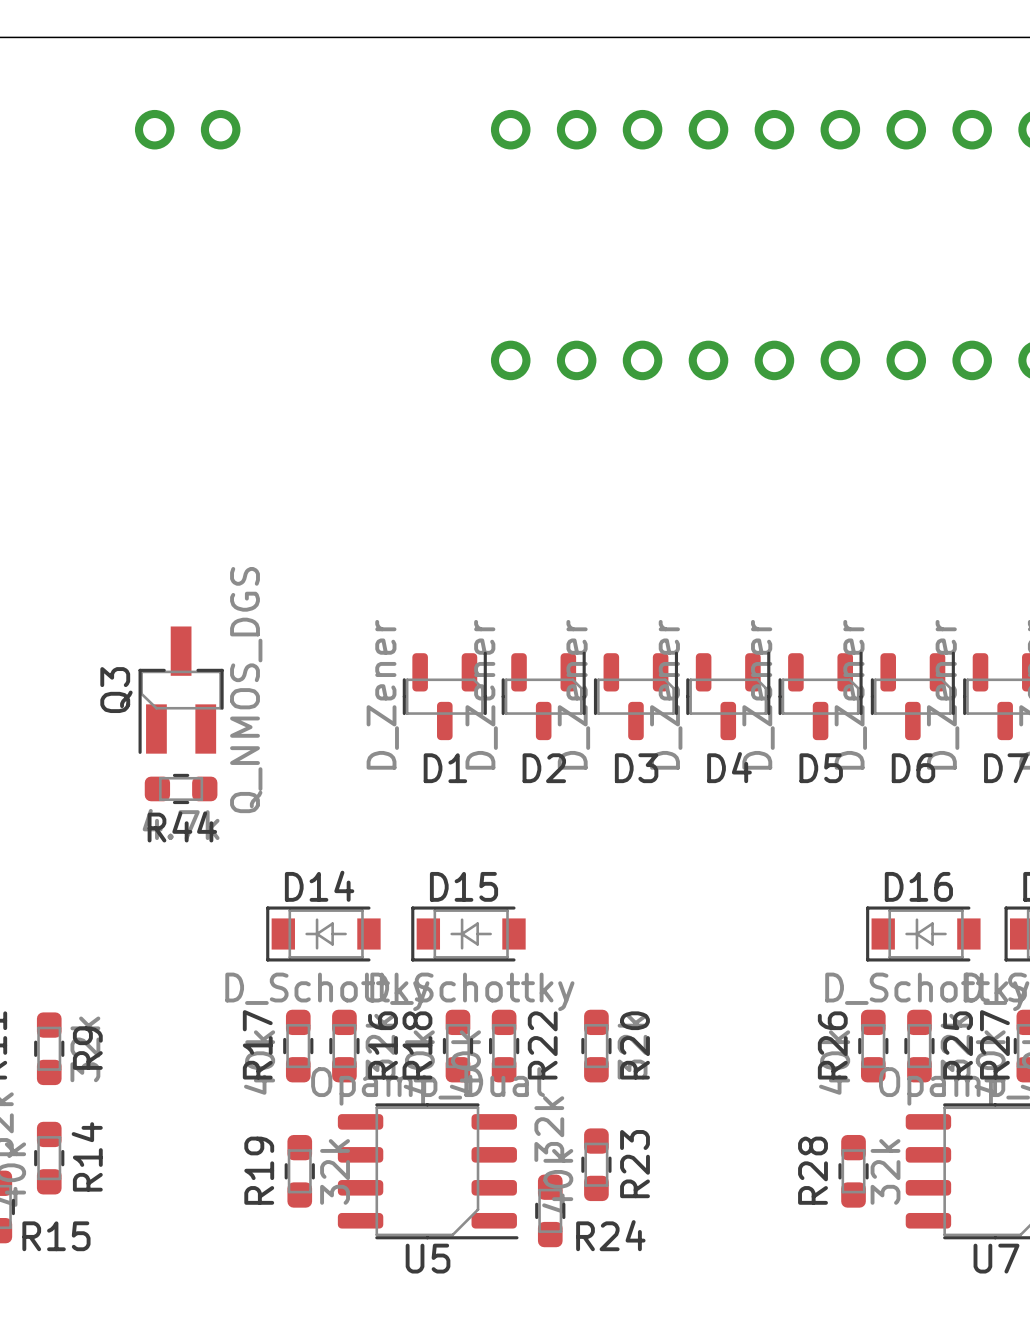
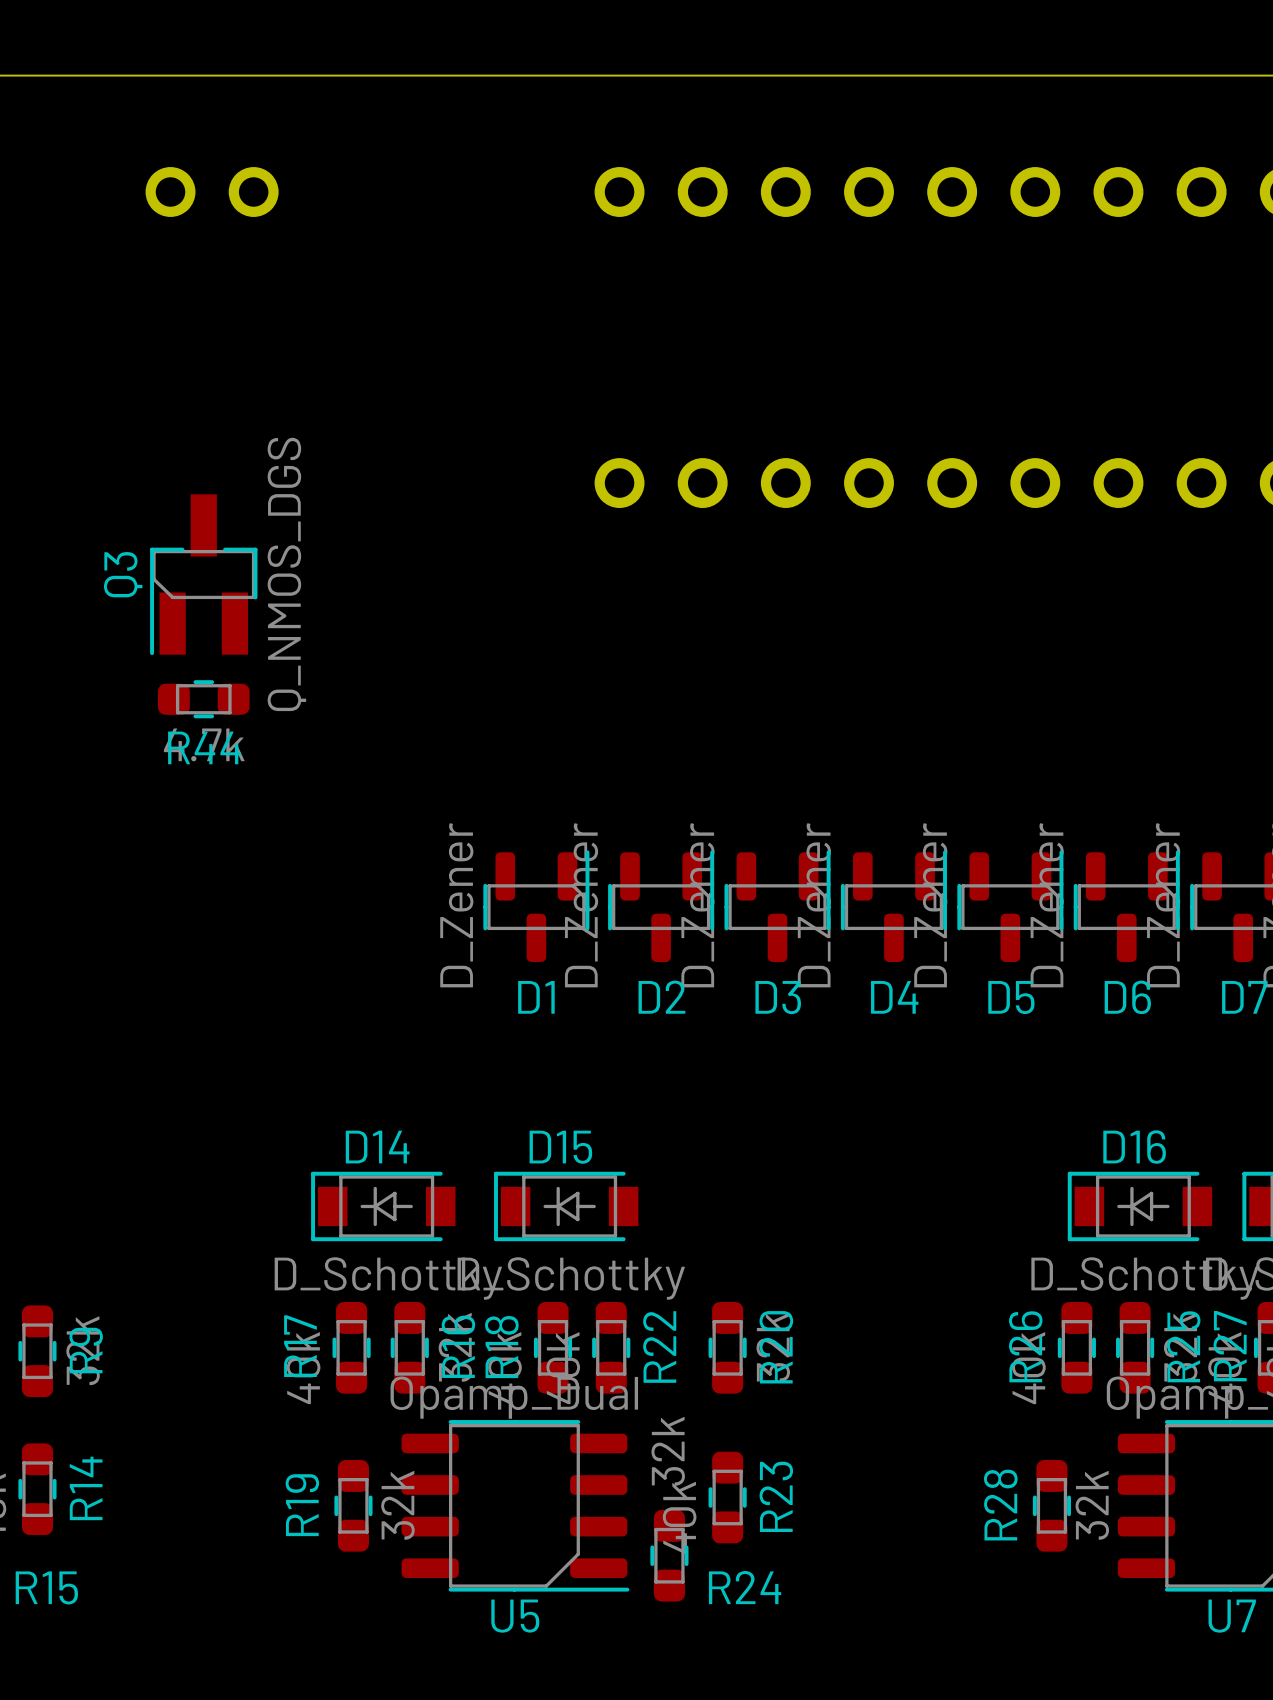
Q3 position: (181, 690) -> (203, 574)
R44 position: (181, 788) -> (203, 699)

